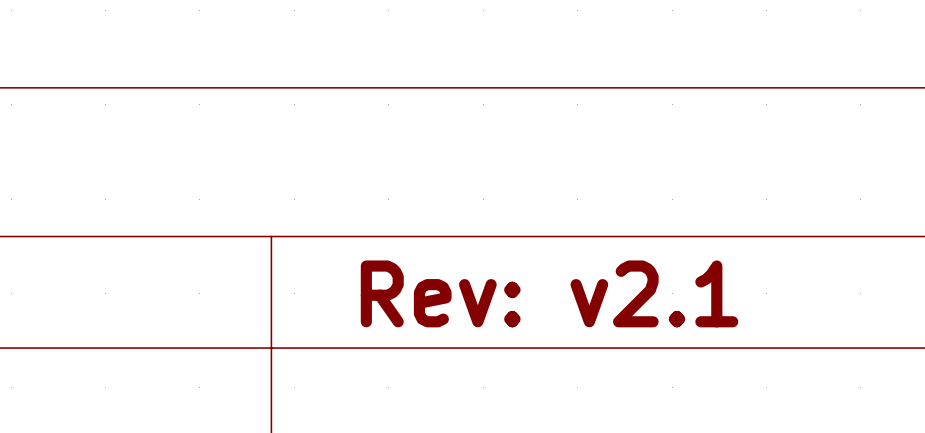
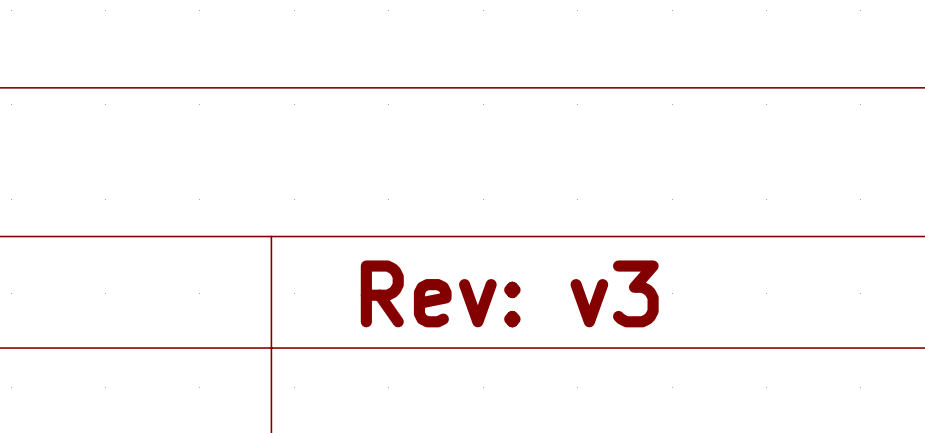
title block: Rev: v2.1 (549, 293) -> Rev: v3 (509, 293)

